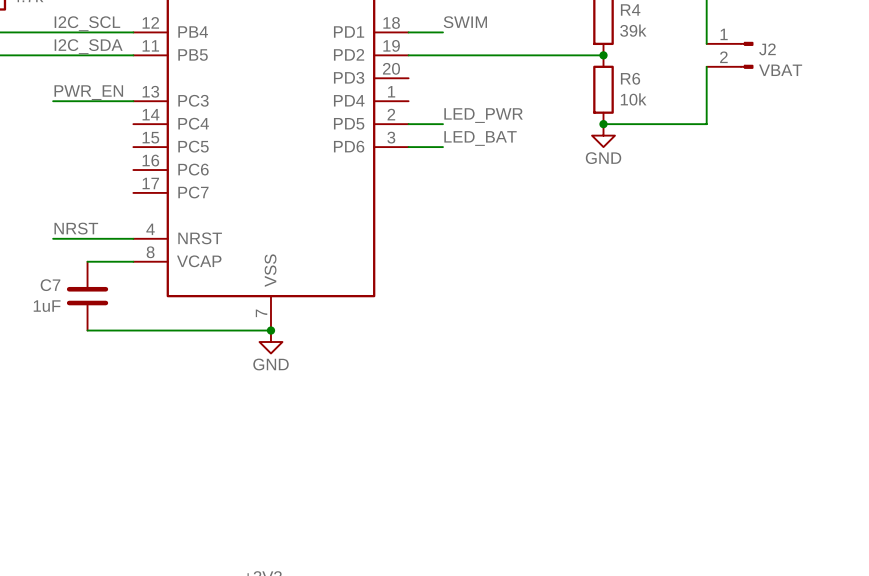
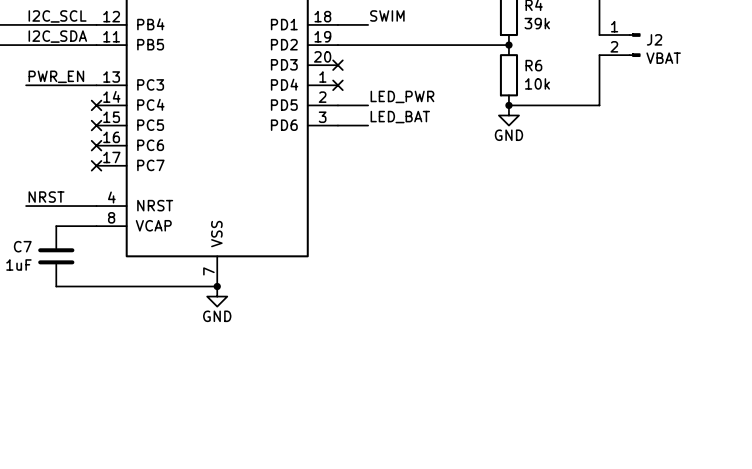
no-connect mark: none -> (337, 65)
no-connect mark: none -> (337, 85)
no-connect mark: none -> (96, 105)
no-connect mark: none -> (96, 125)
no-connect mark: none -> (96, 145)
no-connect mark: none -> (96, 165)

